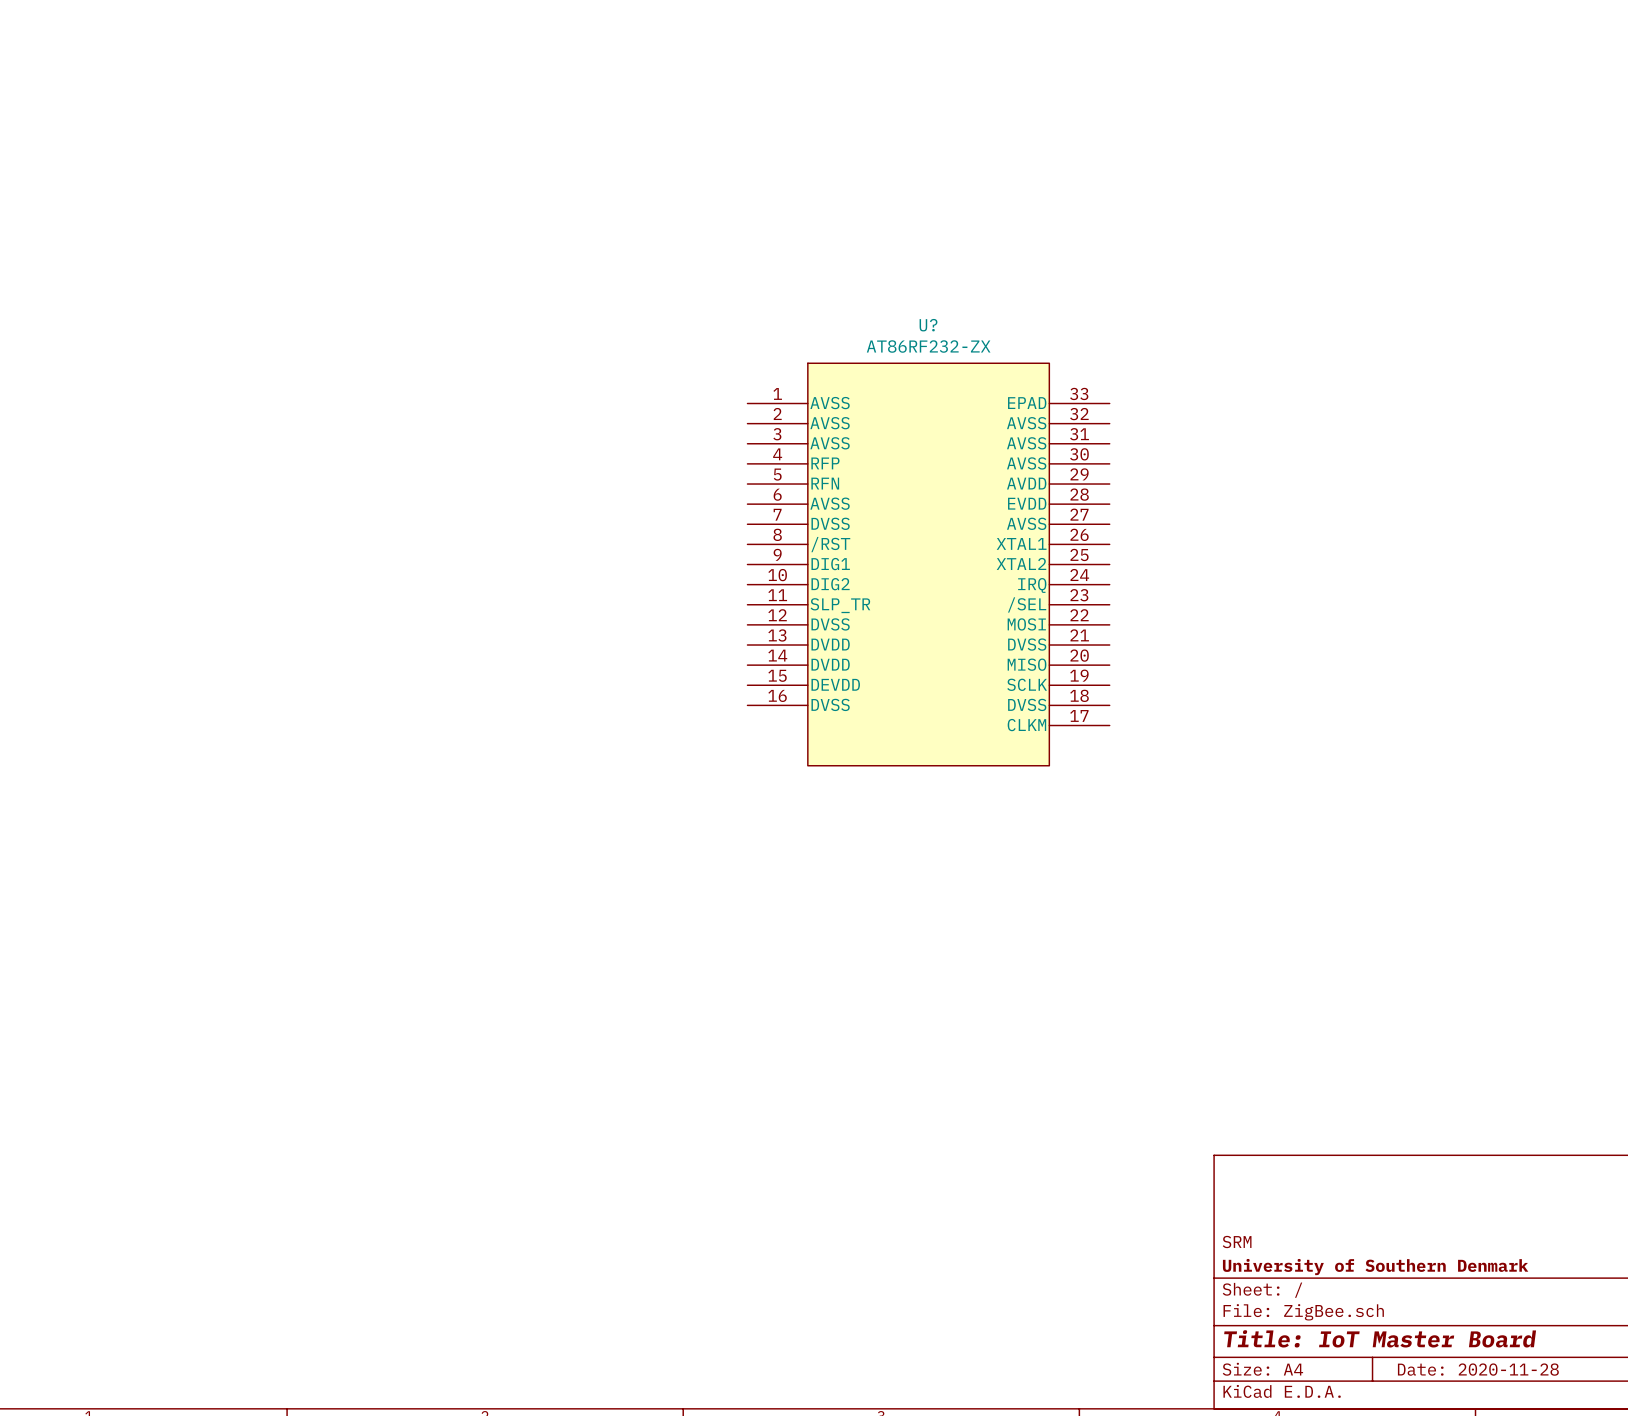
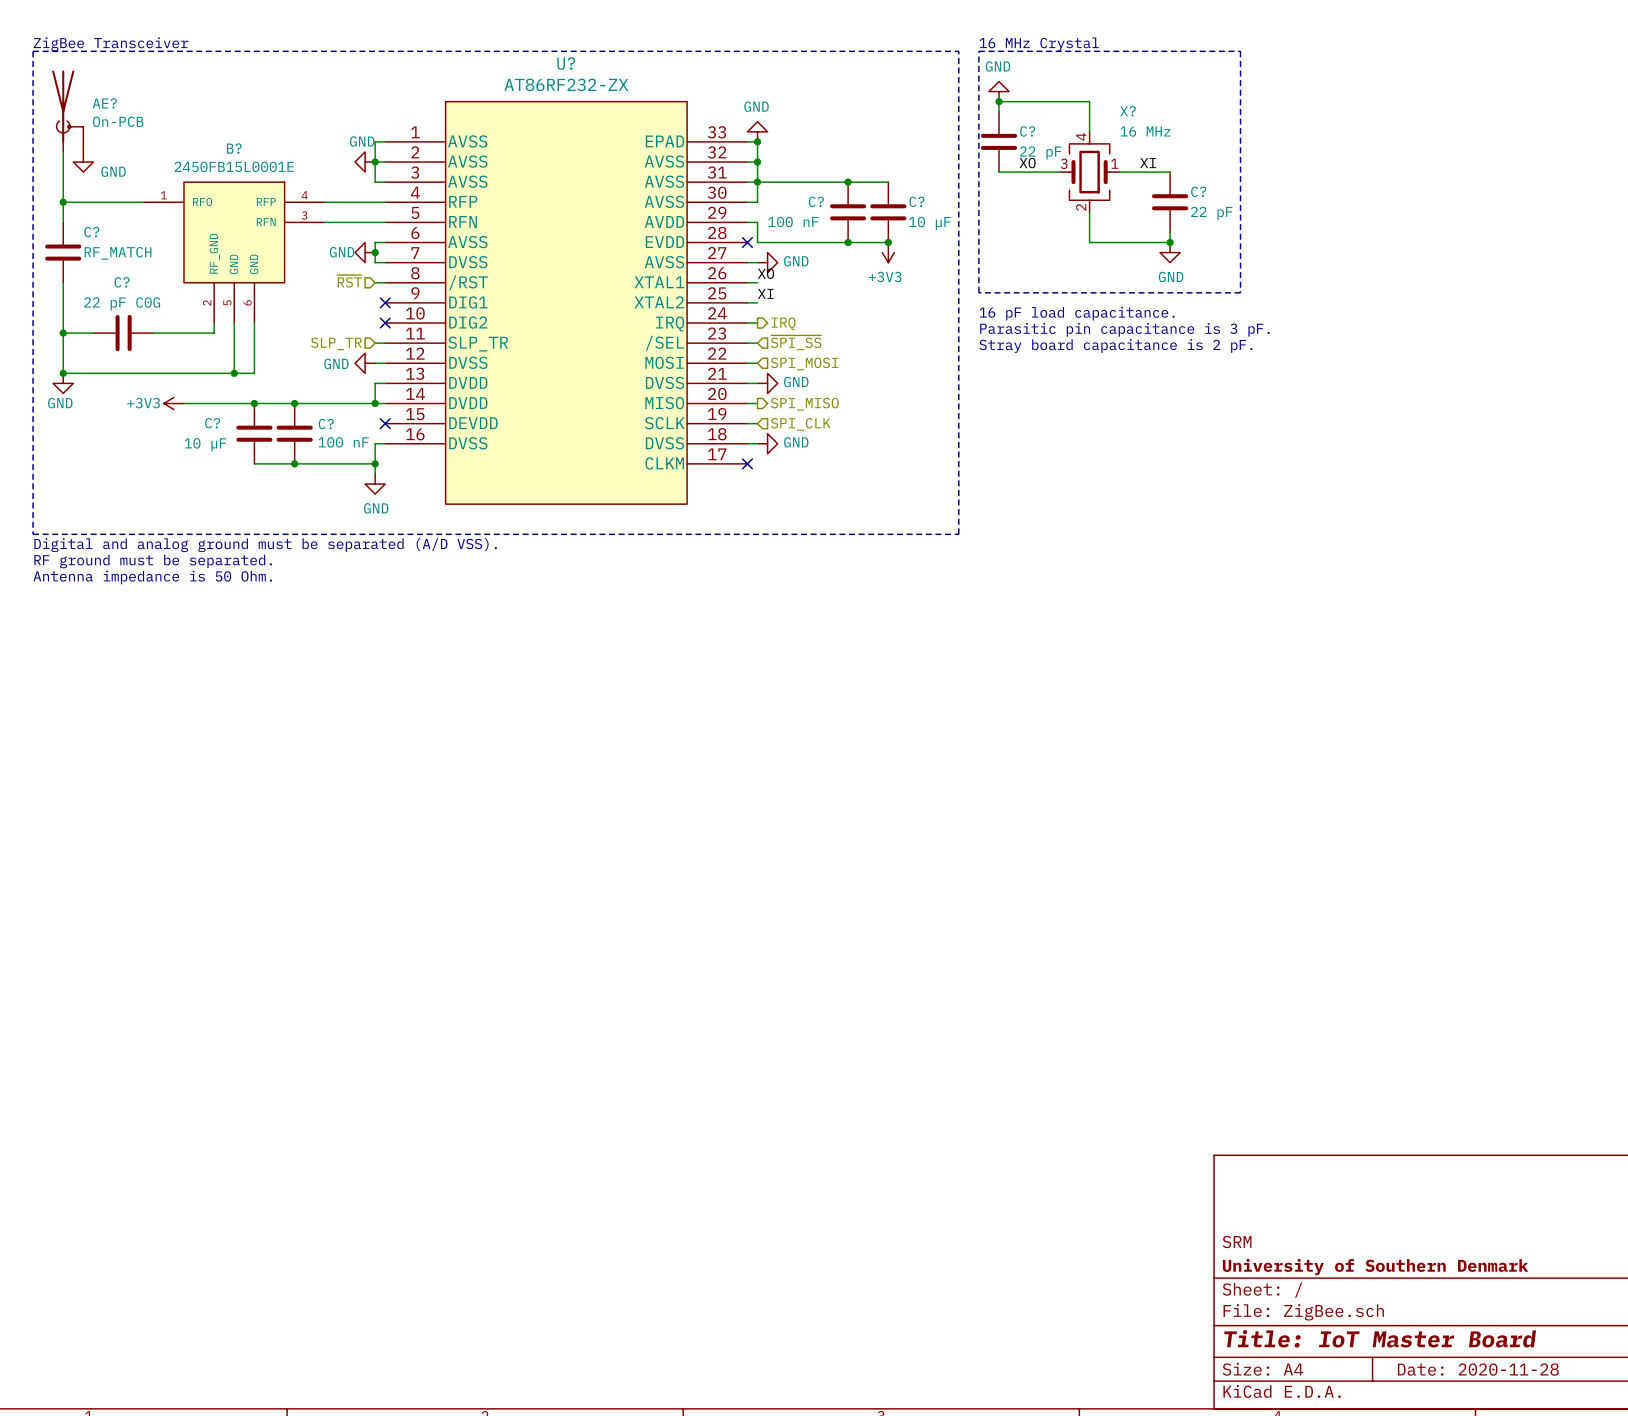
text: none -> ZigBee Transceiver (110, 44)
text: none -> 16 MHz Crystal (1039, 44)
line: none -> (33, 51) (958, 51) (958, 534) (33, 534) (33, 51)
line: none -> (978, 51) (1240, 51) (1240, 292) (978, 292) (978, 51)
power symbol: none -> GND (999, 91)
junction: none -> (999, 101)
AE?: none -> On-PCB (67, 111)
wire: none -> (999, 111) (999, 101) (1089, 101) (1089, 131)
power symbol: none -> GND (757, 131)
wire: none -> (385, 141) (375, 141) (375, 182) (385, 182)
wire: none -> (747, 141) (757, 141) (757, 202) (747, 202)
junction: none -> (757, 141)
C?: none -> 22 pF (999, 141)
wire: none -> (63, 151) (63, 222)
power symbol: none -> GND (83, 162)
power symbol: none -> GND (365, 162)
wire: none -> (375, 162) (385, 162)
junction: none -> (375, 162)
wire: none -> (747, 162) (757, 162)
junction: none -> (757, 162)
label: none -> XO (1027, 163)
label: none -> XI (1148, 163)
wire: none -> (999, 172) (1059, 172)
X?: none -> 16 MHz (1089, 172)
wire: none -> (1119, 172) (1170, 172)
wire: none -> (747, 182) (888, 182)
junction: none -> (757, 182)
junction: none -> (848, 182)
wire: none -> (63, 202) (143, 202)
junction: none -> (63, 202)
wire: none -> (324, 202) (385, 202)
C?: none -> 22 pF (1170, 202)
C?: none -> 100 nF (848, 212)
C?: none -> 10 µF (888, 212)
wire: none -> (1089, 212) (1089, 242) (1170, 242) (1170, 232)
wire: none -> (324, 222) (385, 222)
wire: none -> (747, 222) (757, 222) (757, 242) (888, 242)
wire: none -> (385, 242) (375, 242) (375, 262) (385, 262)
no-connect mark: none -> (747, 242)
junction: none -> (848, 242)
junction: none -> (888, 242)
junction: none -> (1170, 242)
C?: none -> RF_MATCH (63, 252)
B?: none -> 2450FB15L0001E (234, 252)
power symbol: none -> GND (365, 252)
junction: none -> (375, 252)
power symbol: none -> +3V3 (888, 252)
power symbol: none -> GND (1170, 252)
wire: none -> (747, 262) (757, 262)
power symbol: none -> GND (767, 262)
label: none -> XO (765, 273)
hierarchical label: none -> ~{RST} (349, 281)
wire: none -> (63, 282) (63, 373) (254, 373) (254, 323)
wire: none -> (375, 282) (385, 282)
wire: none -> (747, 282) (757, 282)
label: none -> XI (765, 293)
no-connect mark: none -> (385, 302)
U?: none -> AT86RF232-ZX (566, 302)
wire: none -> (747, 302) (757, 302)
text: none -> 16 pF load capacitance. (1077, 313)
wire: none -> (214, 323) (214, 333) (153, 333)
wire: none -> (234, 323) (234, 373)
no-connect mark: none -> (385, 323)
wire: none -> (747, 323) (757, 323)
hierarchical label: none -> IRQ (783, 323)
text: none -> Parasitic pin capacitance is 3 pF. (1124, 329)
wire: none -> (63, 333) (93, 333)
junction: none -> (63, 333)
C?: none -> 22 pF C0G (123, 333)
hierarchical label: none -> ~{SPI_SS} (796, 342)
hierarchical label: none -> SLP_TR (336, 343)
wire: none -> (375, 343) (385, 343)
wire: none -> (747, 343) (757, 343)
text: none -> Stray board capacitance is 2 pF. (1115, 346)
power symbol: none -> GND (365, 363)
wire: none -> (375, 363) (385, 363)
wire: none -> (747, 363) (757, 363)
hierarchical label: none -> SPI_MOSI (804, 364)
junction: none -> (63, 373)
junction: none -> (234, 373)
power symbol: none -> GND (63, 383)
wire: none -> (385, 383) (375, 383) (375, 403)
wire: none -> (747, 383) (757, 383)
power symbol: none -> GND (767, 383)
power symbol: none -> +3V3 (173, 403)
wire: none -> (183, 403) (385, 403)
junction: none -> (254, 403)
junction: none -> (294, 403)
junction: none -> (375, 403)
hierarchical label: none -> SPI_MISO (804, 404)
no-connect mark: none -> (385, 423)
hierarchical label: none -> SPI_CLK (800, 424)
C?: none -> 10 µF (254, 433)
C?: none -> 100 nF (294, 433)
wire: none -> (385, 443) (375, 443) (375, 473)
power symbol: none -> GND (767, 443)
wire: none -> (254, 463) (375, 463)
junction: none -> (294, 463)
junction: none -> (375, 463)
no-connect mark: none -> (747, 463)
power symbol: none -> GND (375, 484)
text: none -> Digital and analog ground must be separated (A/D VSS). (265, 545)
text: none -> RF ground must be separated. (153, 561)
U?: AT86RF232-ZX (928, 564) -> none
text: none -> Antenna impedance is 50 Ohm. (152, 577)

